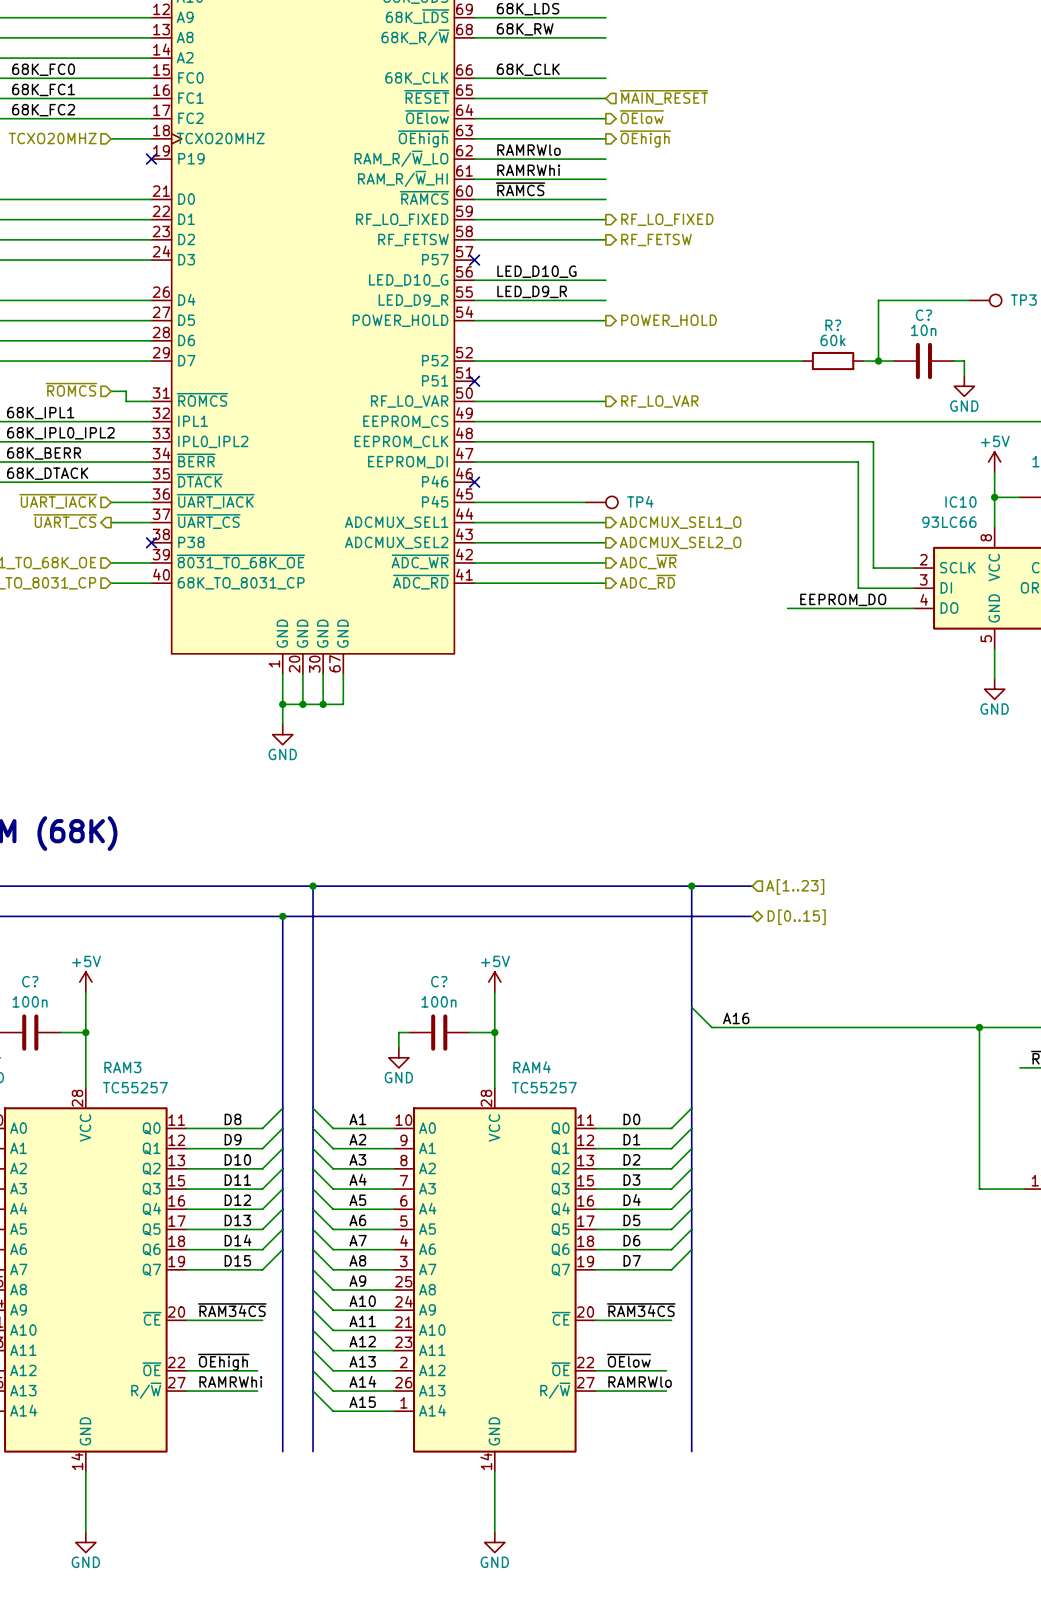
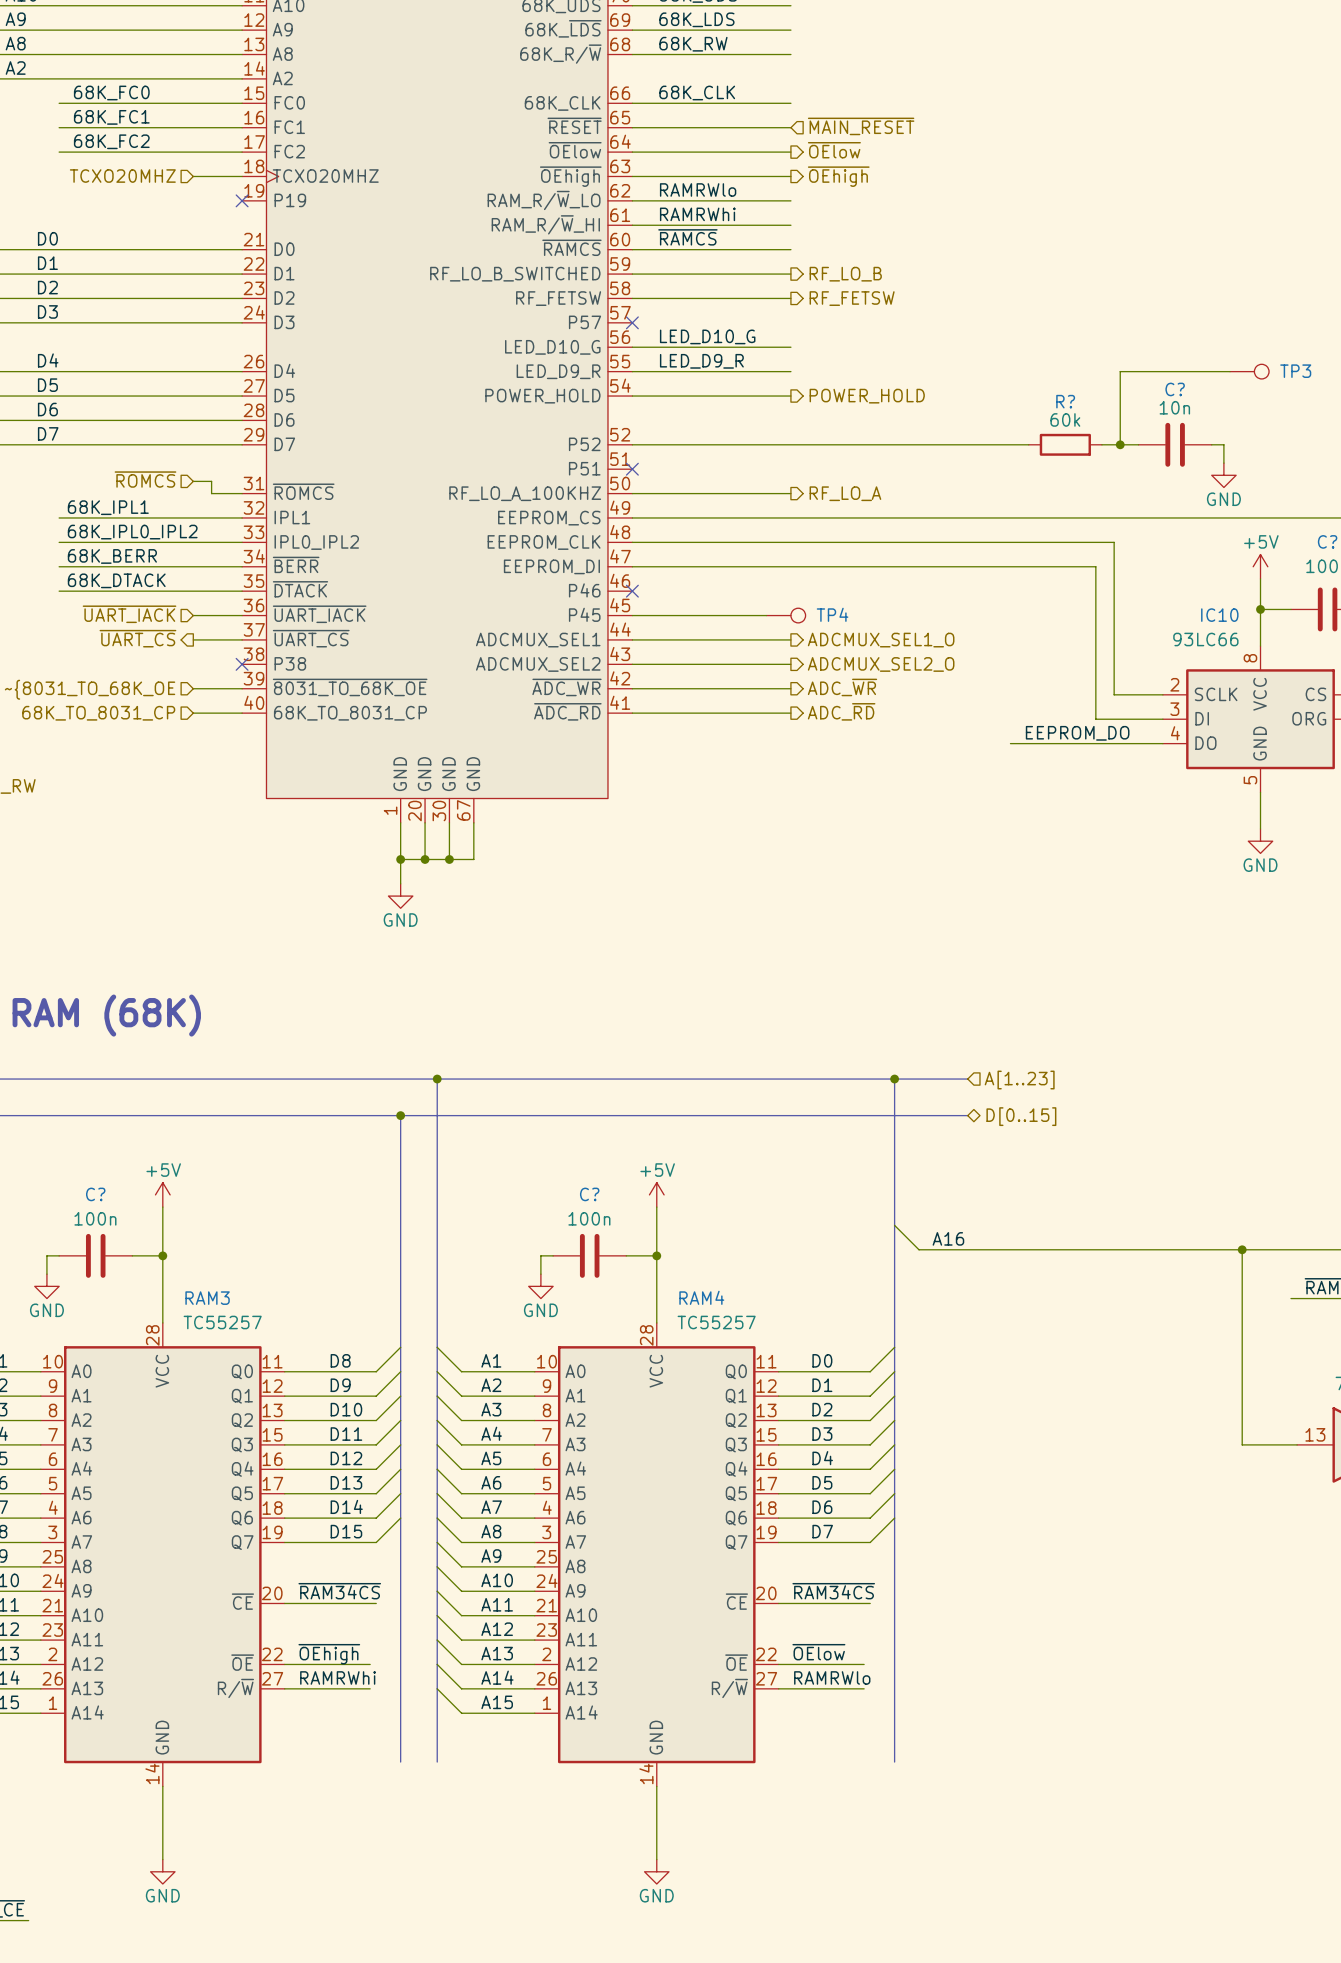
part pin name: RF_LO_FIXED (402, 219) -> RF_LO_B_SWITCHED (515, 274)
hierarchical label: RF_LO_FIXED (667, 219) -> RF_LO_B (845, 274)
part pin name: RF_LO_VAR (409, 401) -> RF_LO_A_100KHZ (525, 493)
hierarchical label: RF_LO_VAR (659, 401) -> RF_LO_A (845, 493)

